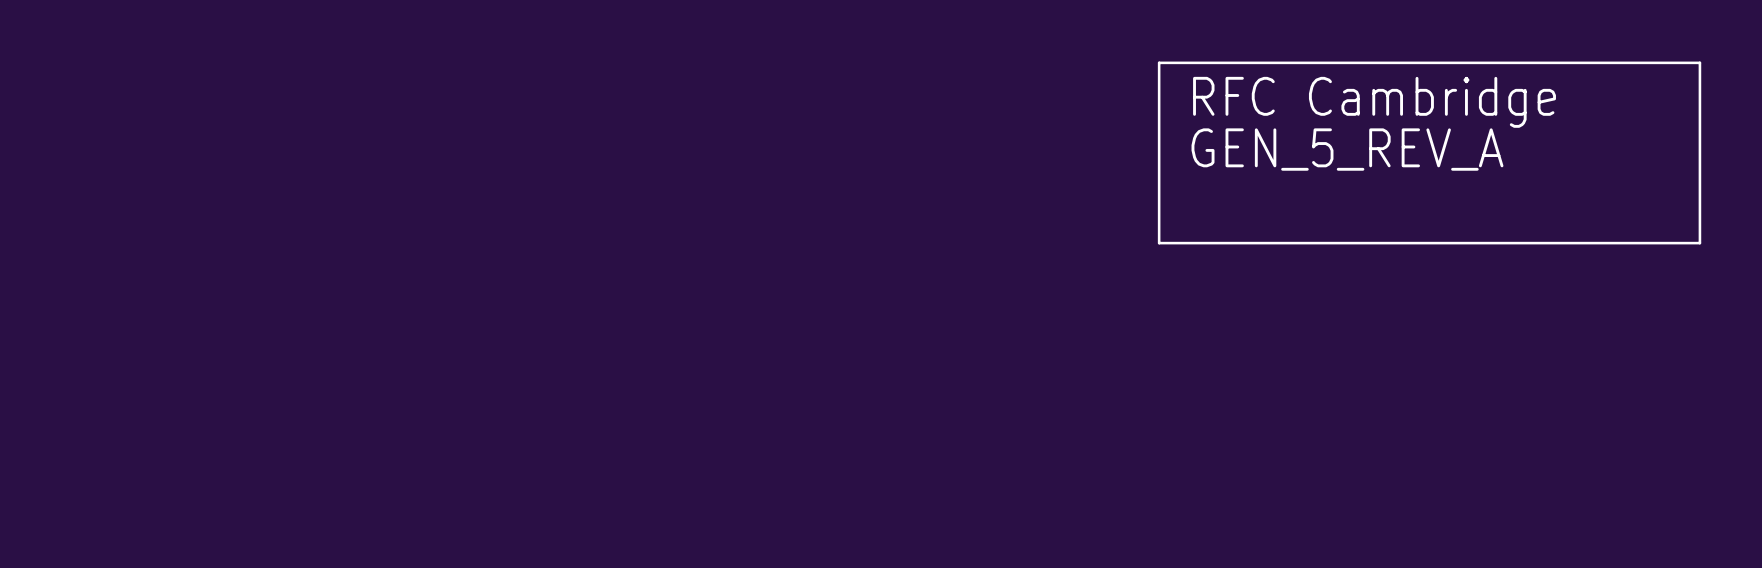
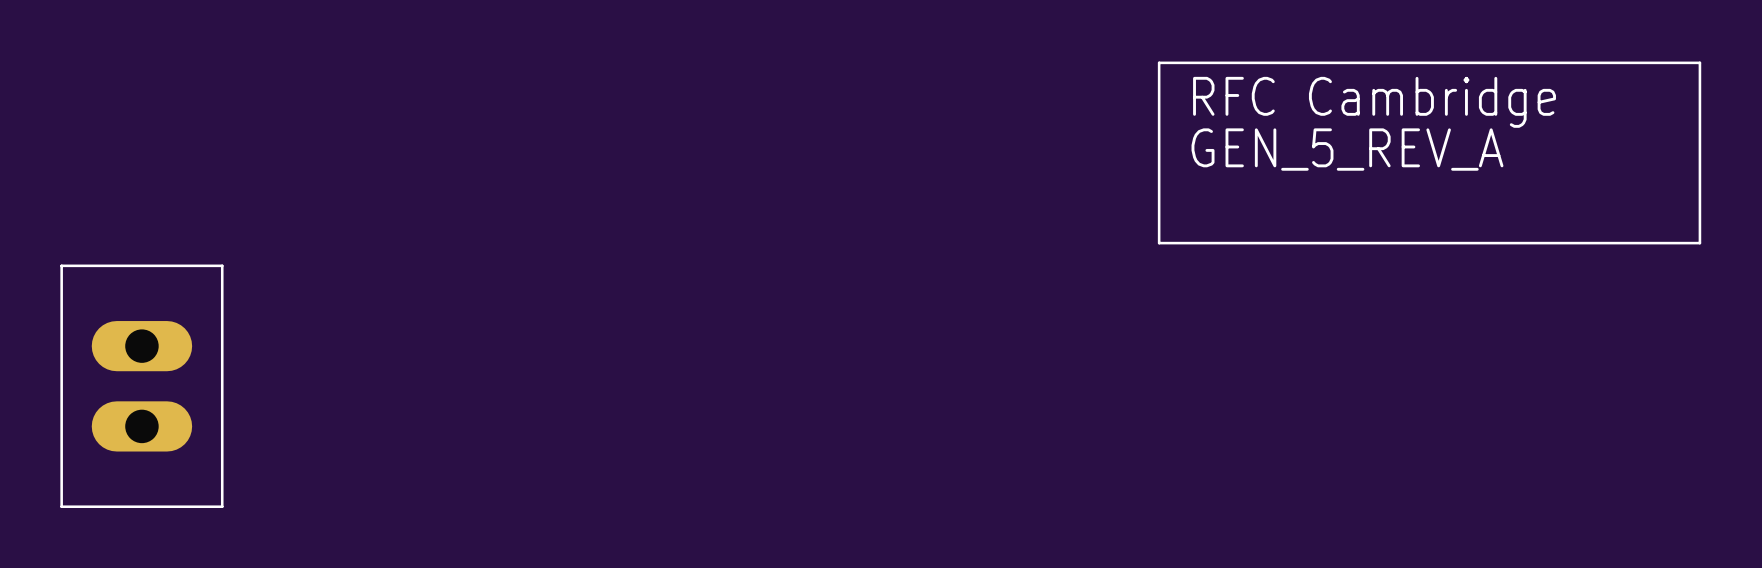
part: none -> (141, 386)

